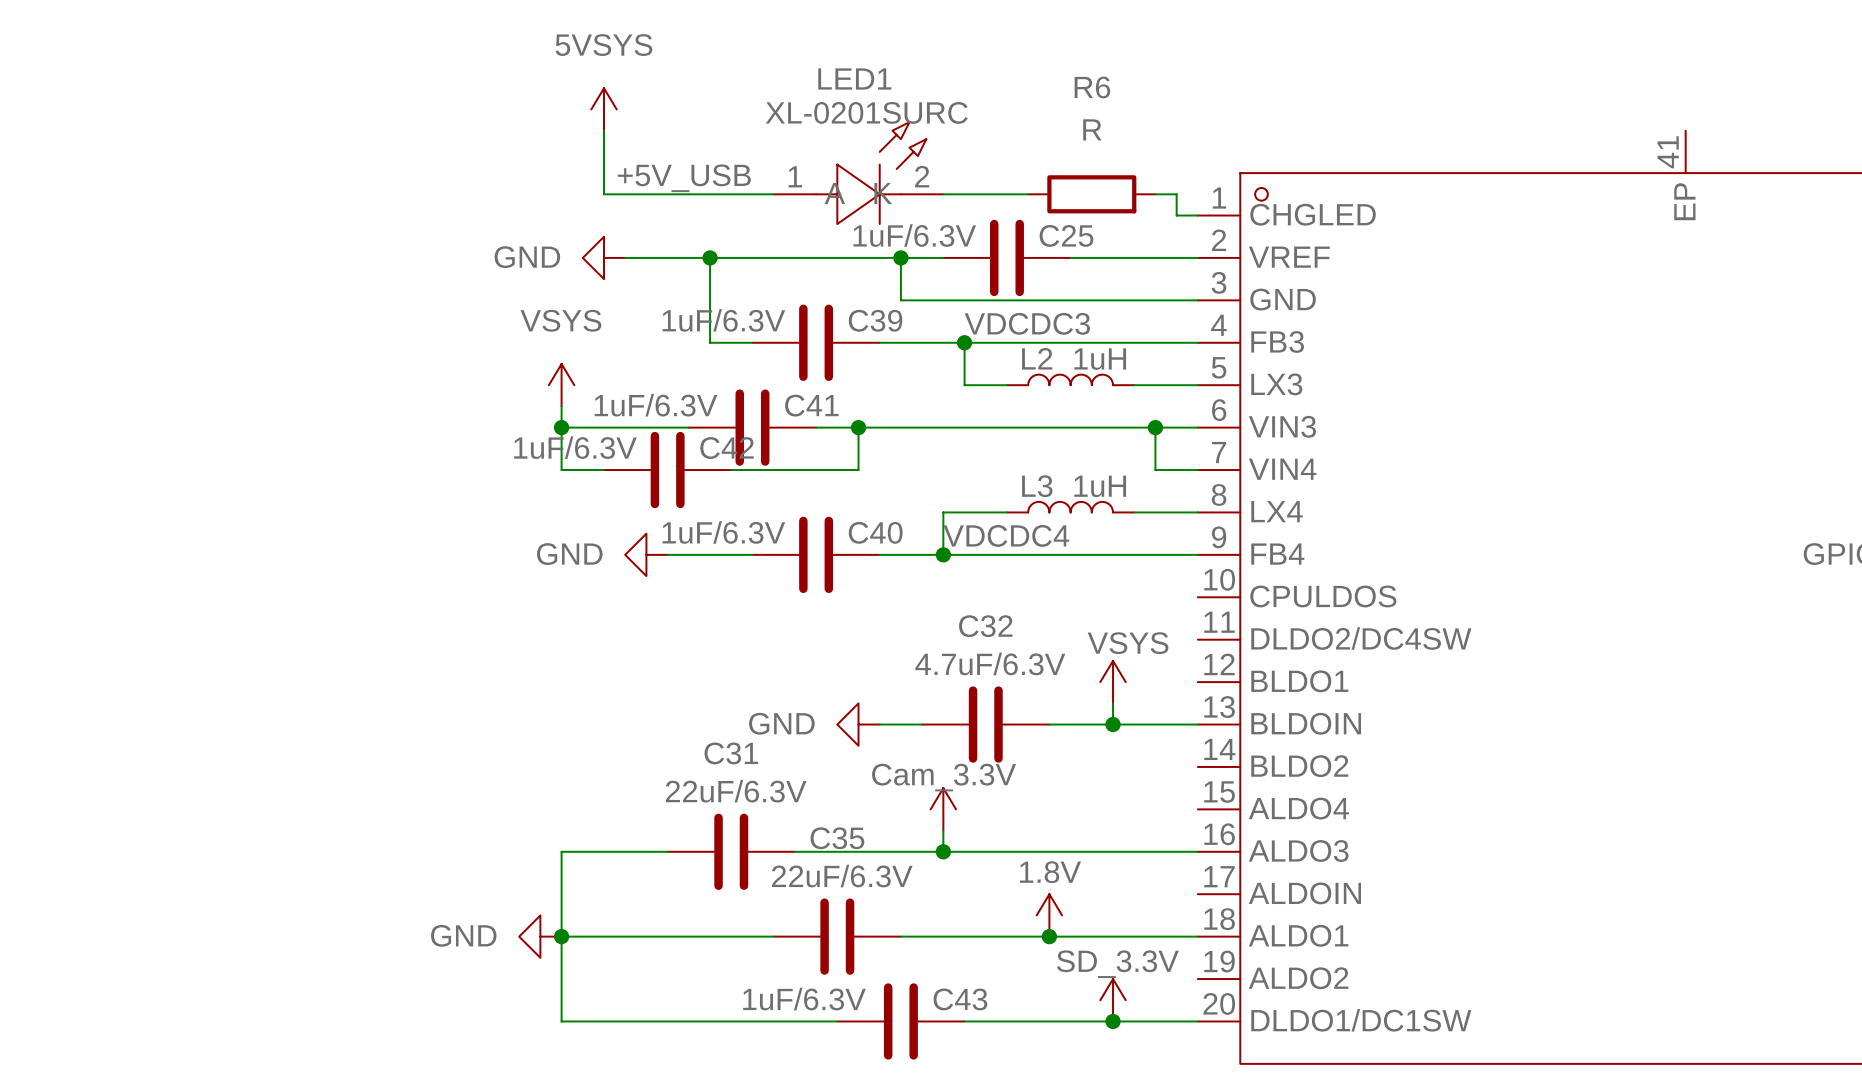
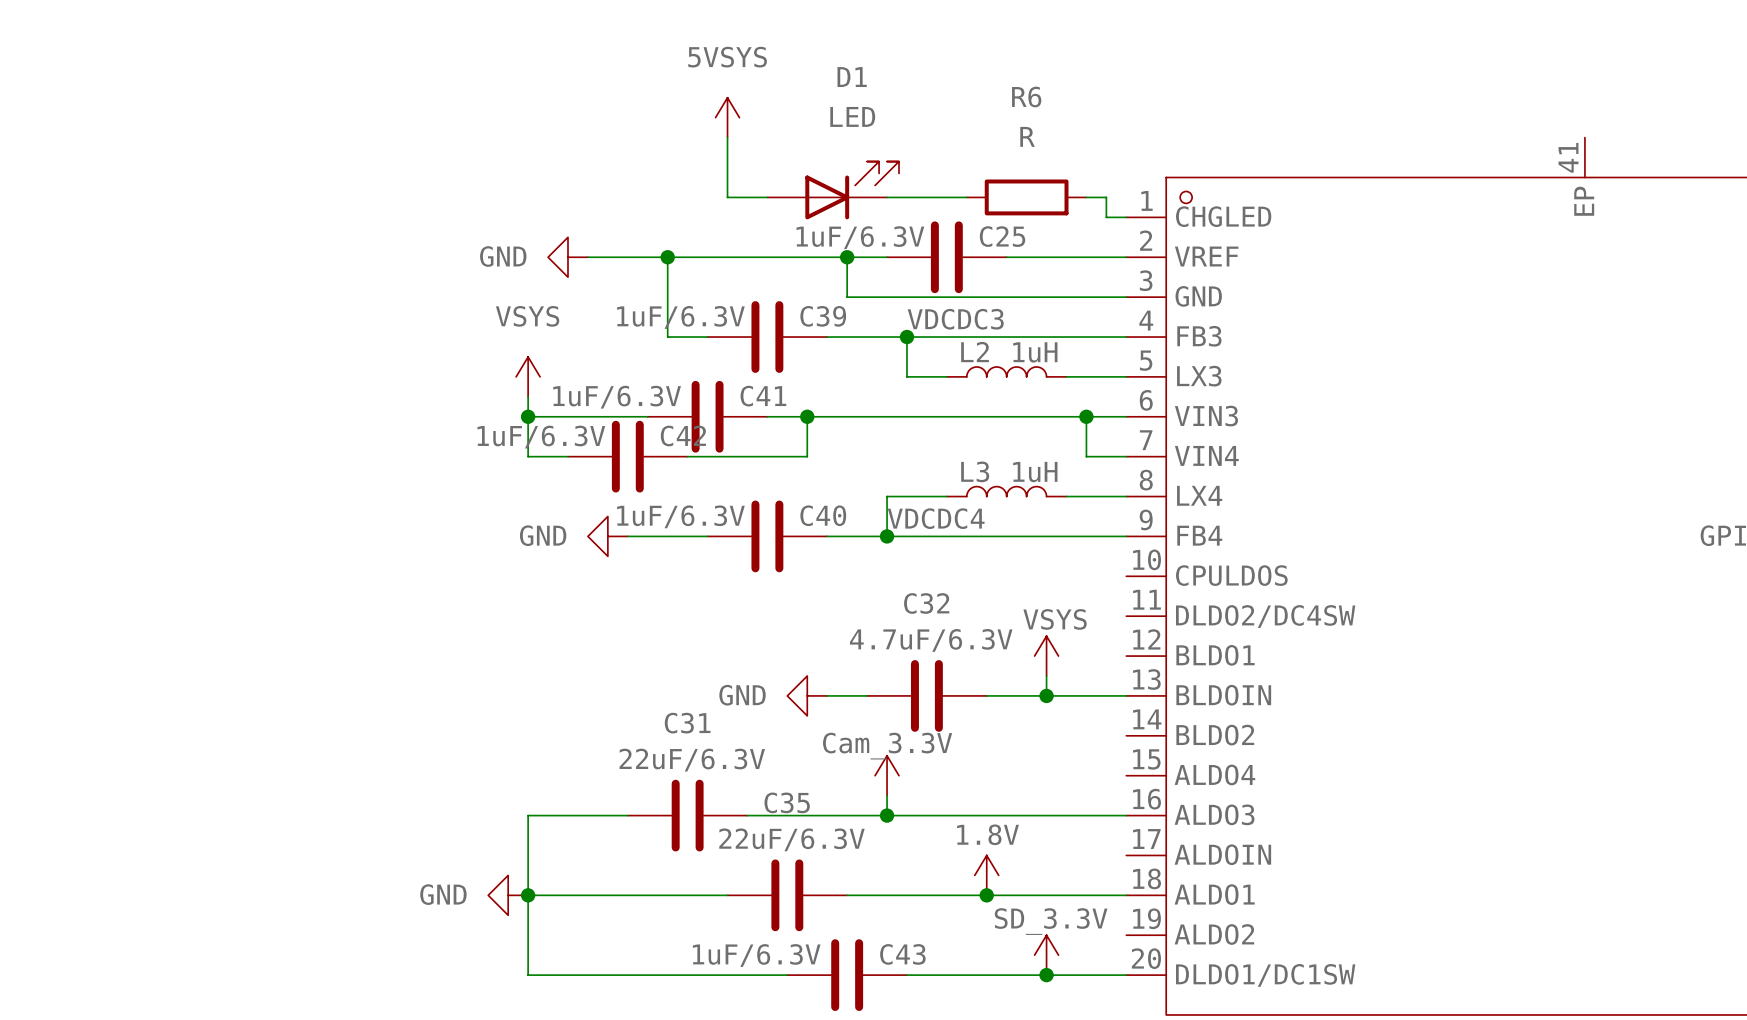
power symbol position: 5VSYS (604, 109) -> 5VSYS (727, 117)
wire: (604, 130) (604, 194) (773, 194) -> none
wire: none -> (727, 137) (727, 197) (767, 197)
LED1: XL-0201SURC (858, 173) -> none
label: +5V_USB (684, 178) -> none
D1: none -> LED (833, 190)

